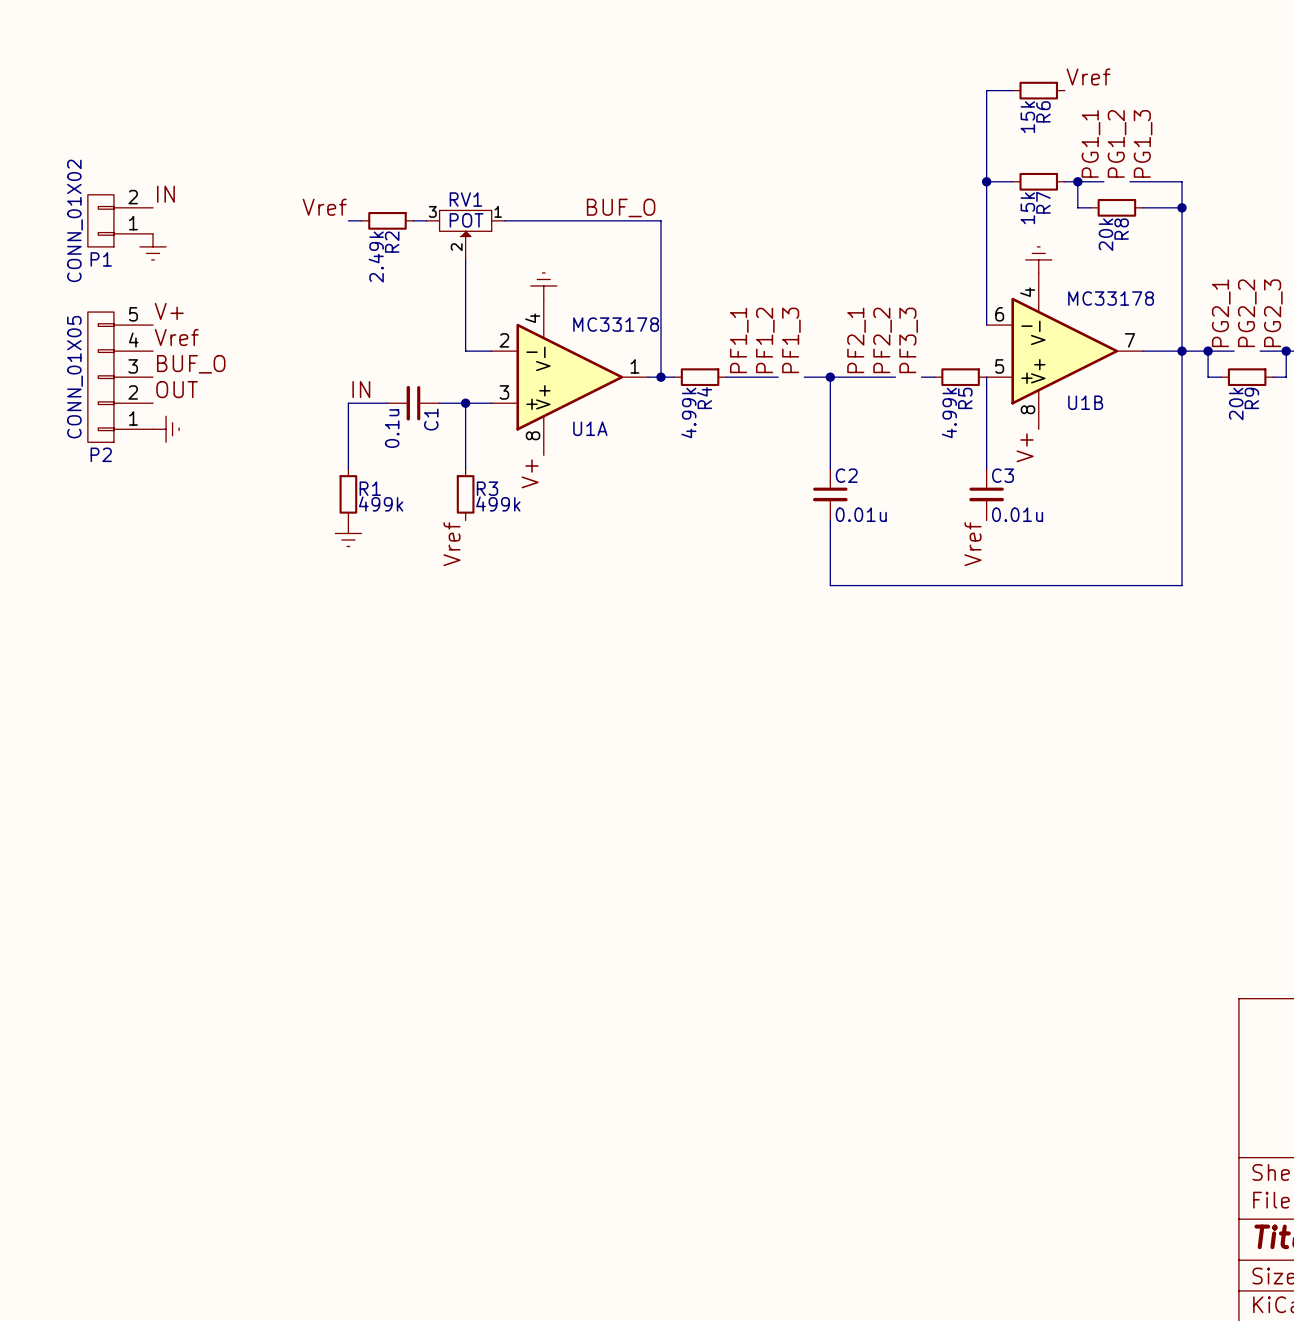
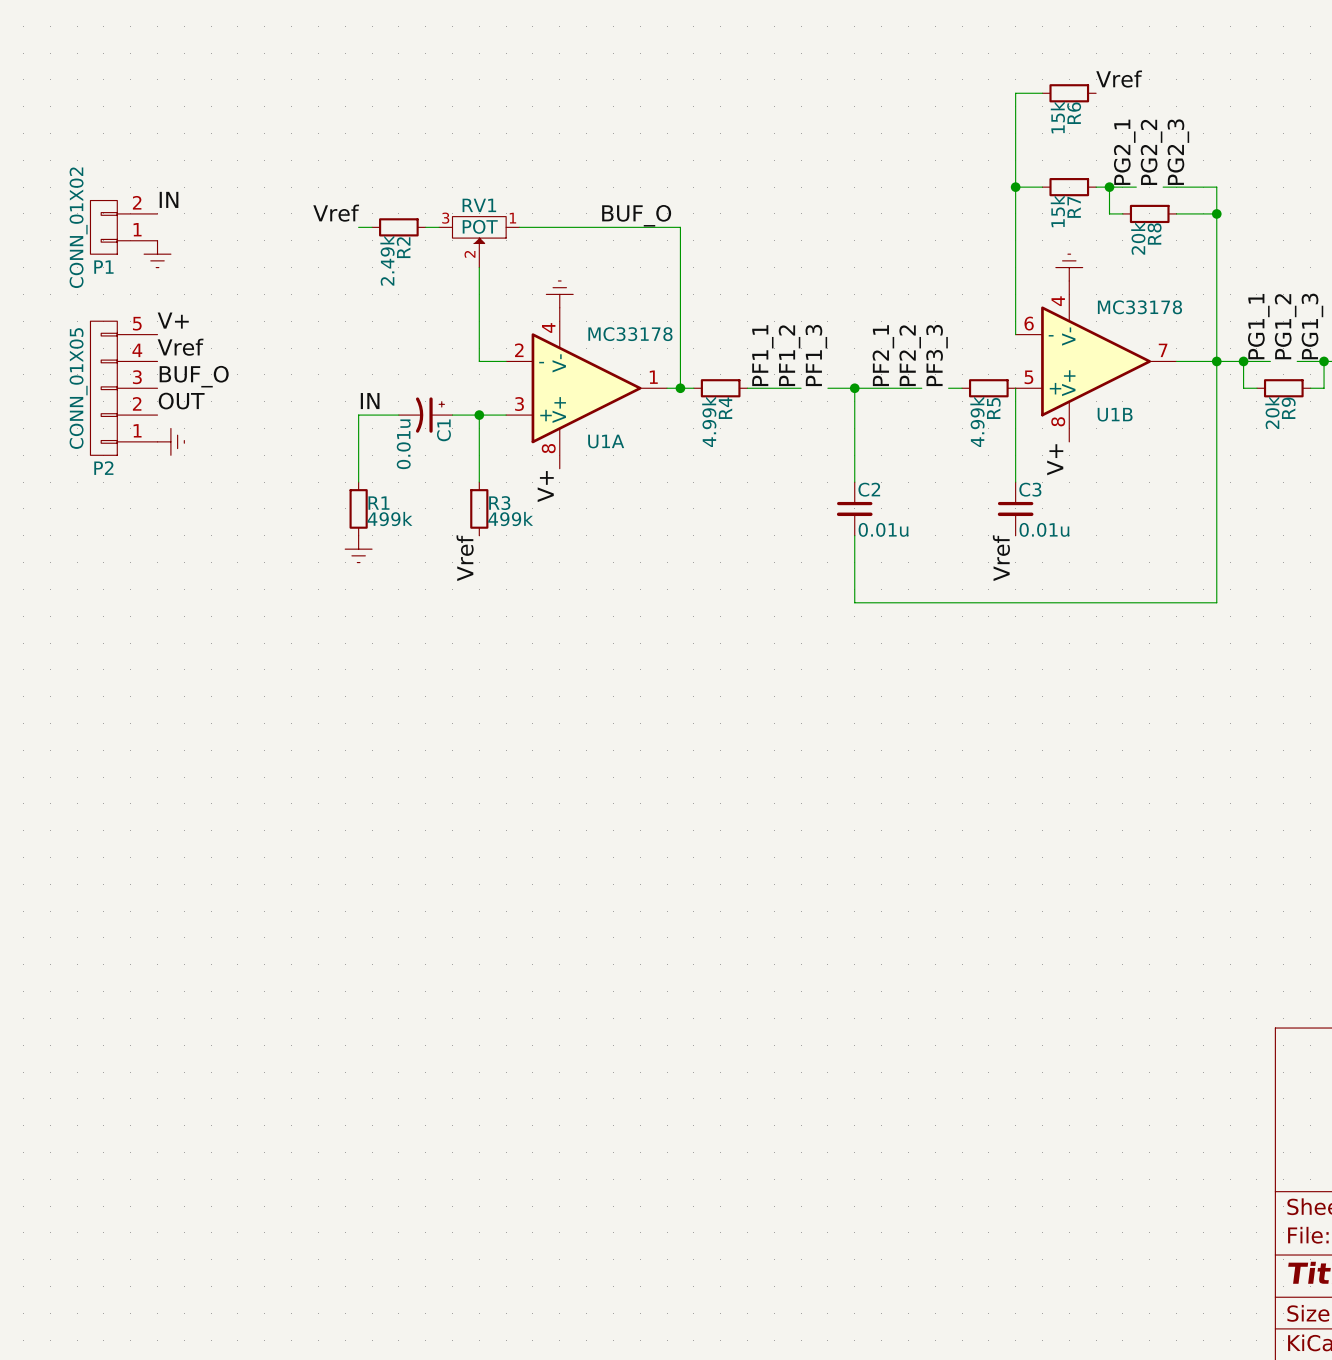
label: PG1_1 (1090, 143) -> PG2_1 (1124, 152)
label: PG1_2 (1117, 143) -> PG2_2 (1151, 152)
label: PG1_3 (1143, 143) -> PG2_3 (1178, 152)
label: PG2_1 (1221, 313) -> PG1_1 (1258, 326)
label: PG2_2 (1247, 313) -> PG1_2 (1285, 326)
label: PG2_3 (1273, 313) -> PG1_3 (1312, 326)
C1 symbol: [387, 385, 440, 421] -> [398, 397, 453, 433]
C1 value: 0.1u (392, 428) -> 0.01u (403, 444)

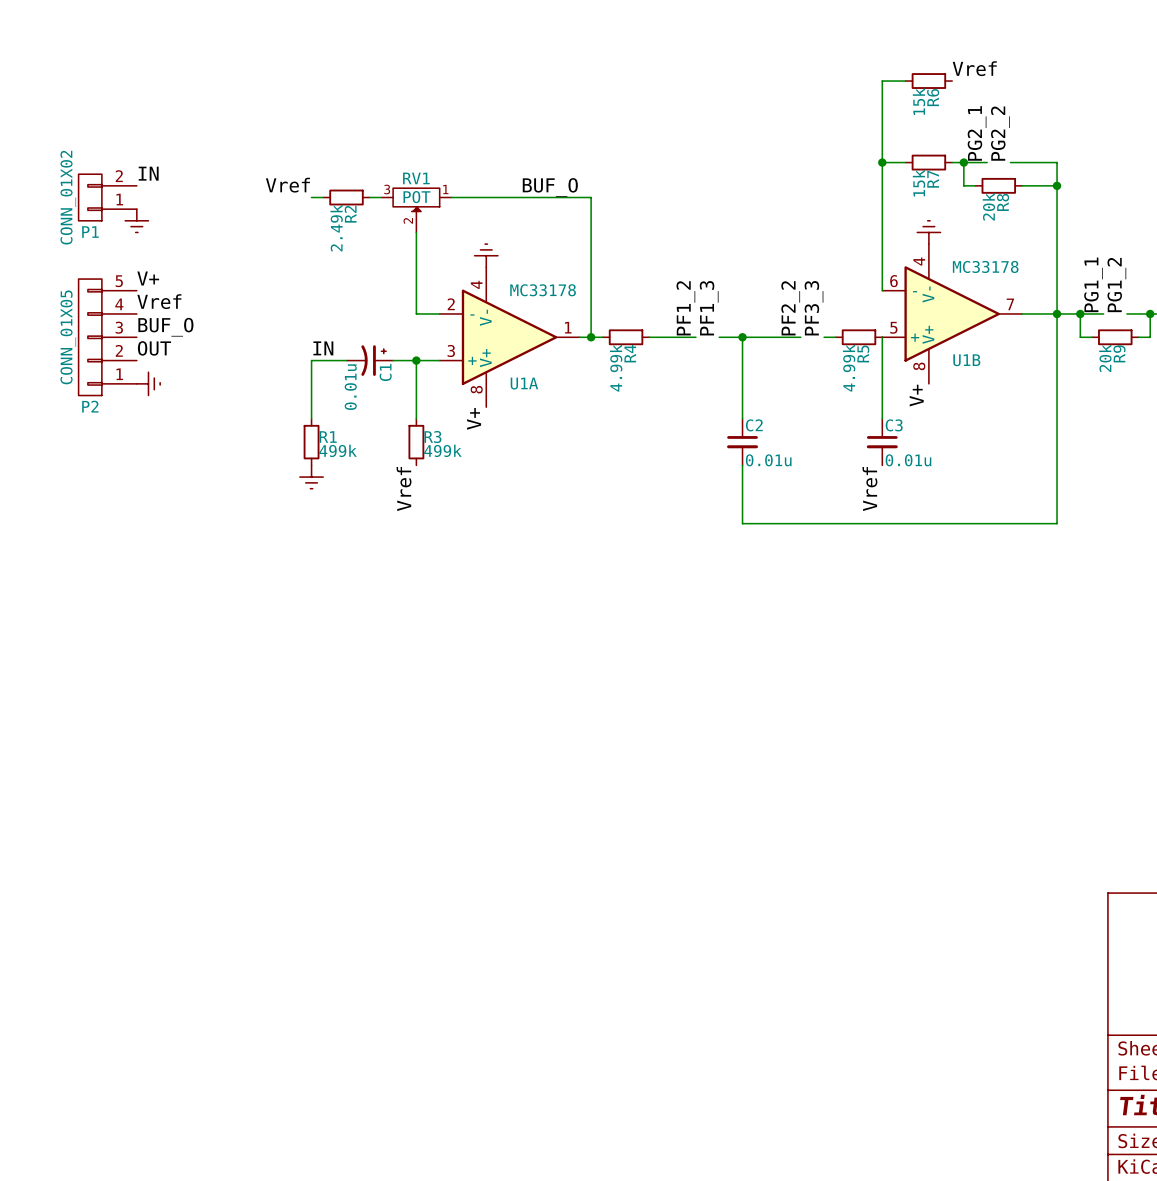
label: PG2_3 (1178, 152) -> none
label: PG1_3 (1312, 326) -> none
label: PF1_1 (762, 355) -> none
label: PF2_1 (883, 355) -> none

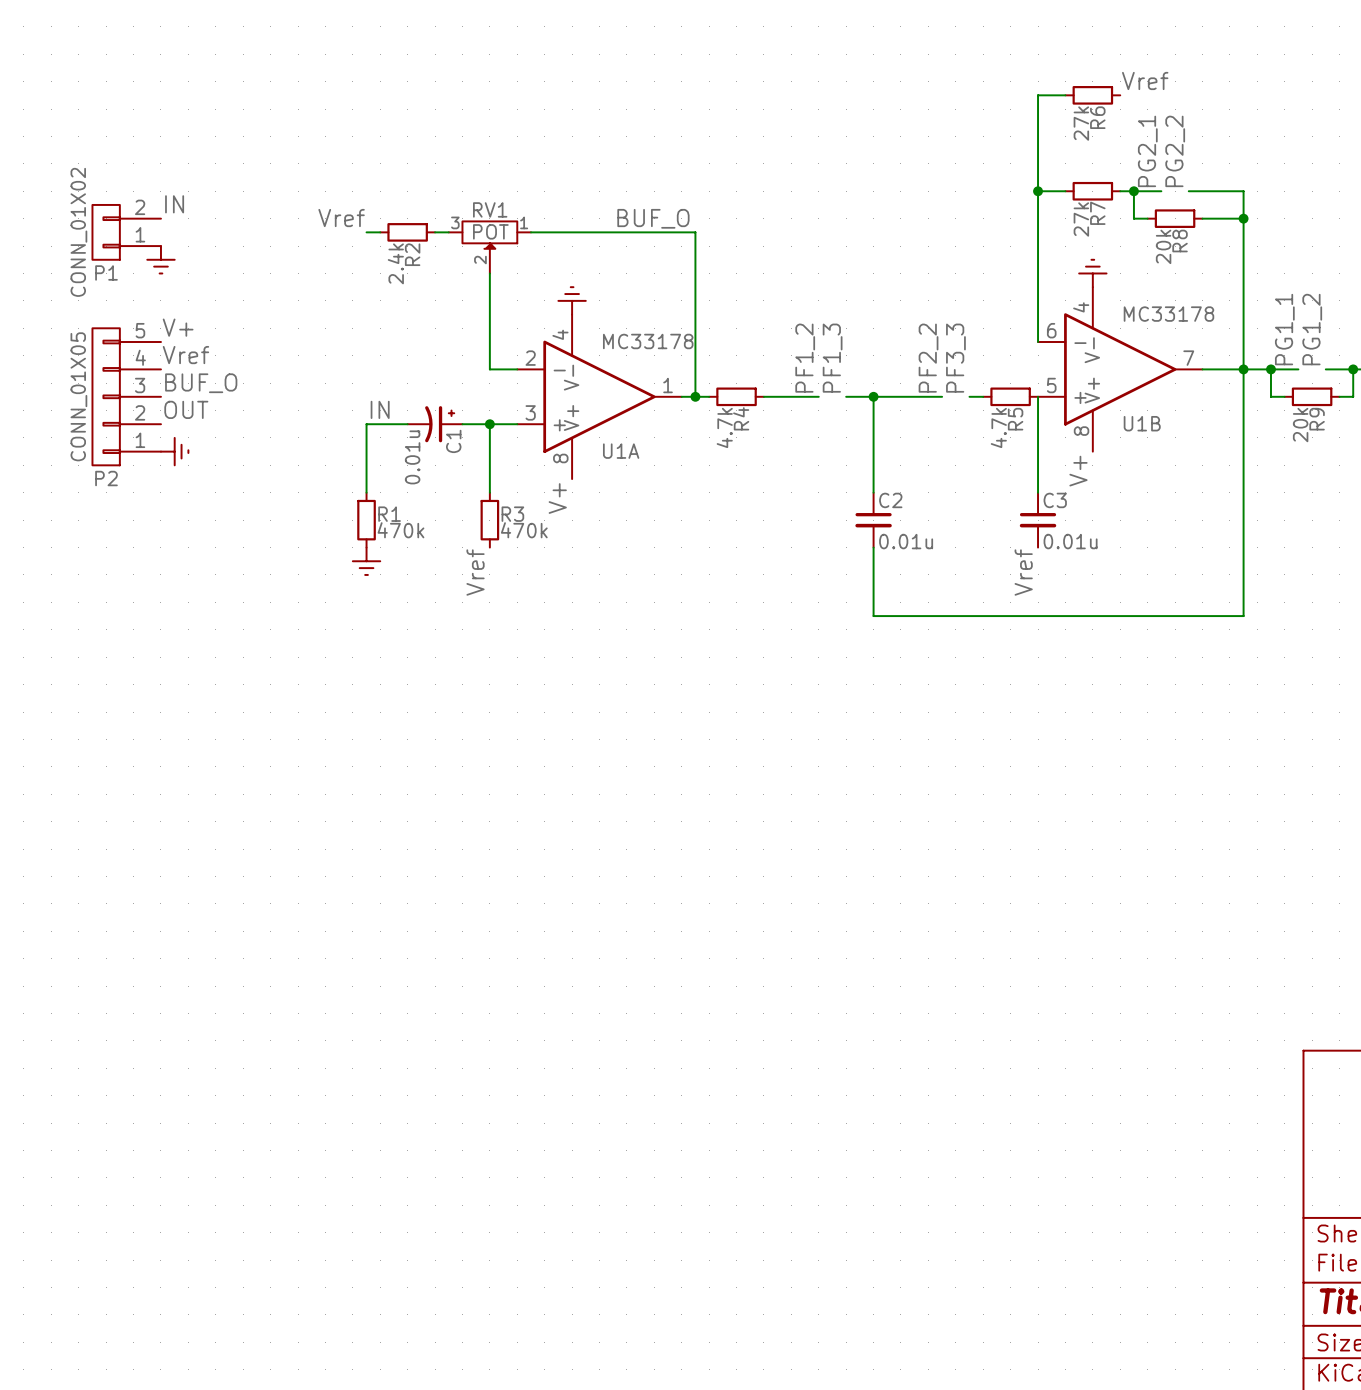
R6 value: 15k (919, 101) -> 27k (1081, 123)
R7 value: 15k (919, 183) -> 27k (1081, 219)
R2 value: 2.49k (336, 228) -> 2.4k (395, 263)
R4 value: 4.99k (616, 368) -> 4.7k (724, 427)
R5 value: 4.99k (849, 368) -> 4.7k (998, 427)
R1 value: 499k (338, 450) -> 470k (400, 530)
R3 value: 499k (442, 450) -> 470k (524, 530)

